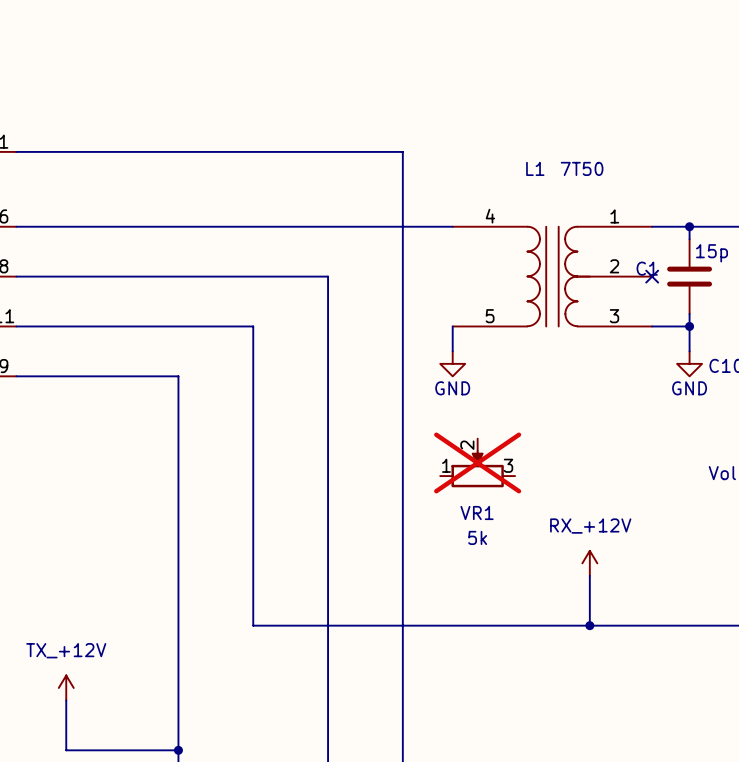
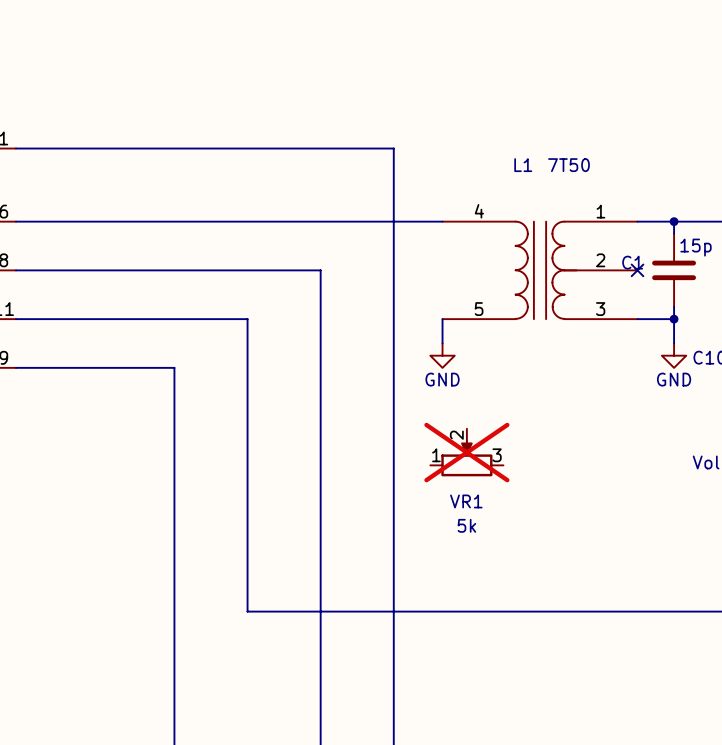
power symbol: RX_+12V (589, 563) -> none
wire: (589, 575) (589, 625) -> none
junction: (589, 625) -> none
power symbol: TX_+12V (66, 687) -> none
wire: (66, 700) (66, 750) (178, 750) -> none
junction: (178, 750) -> none

